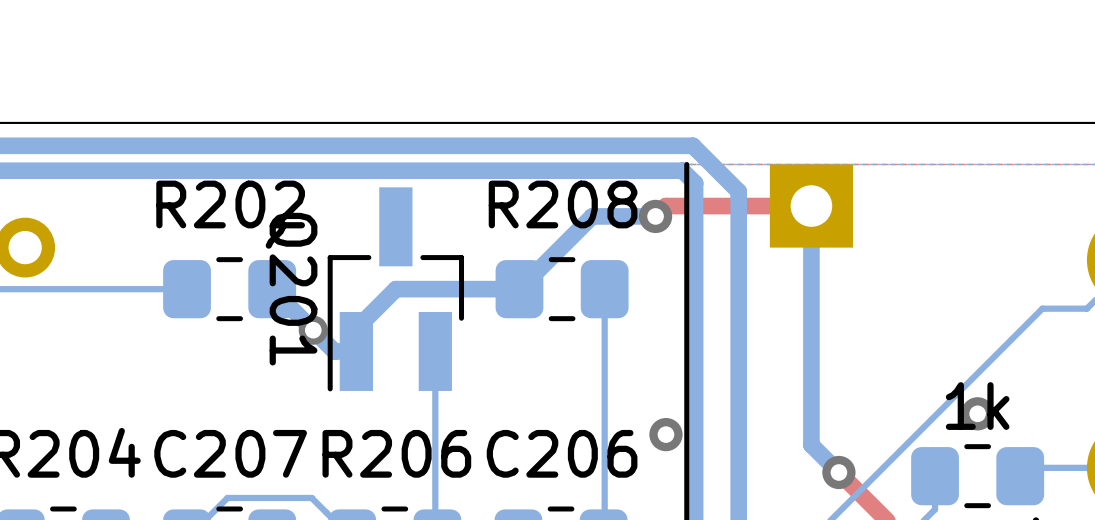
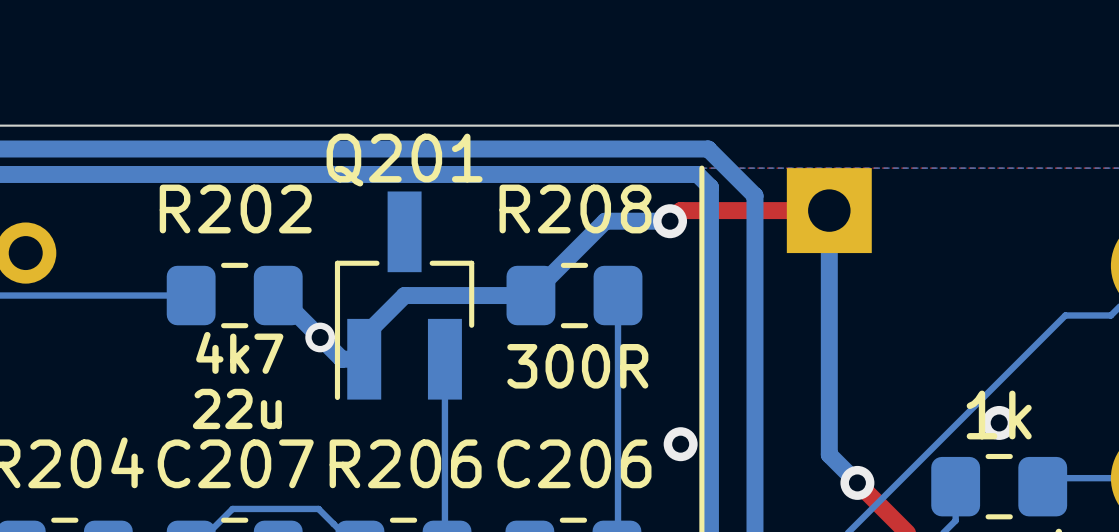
Q201 name rotation: 0° (291, 289) -> 90° counterclockwise (404, 160)
R202 value: none -> 4k7 (239, 352)
R208 value: none -> 300R (577, 366)
C207 value: none -> 22u (237, 408)

